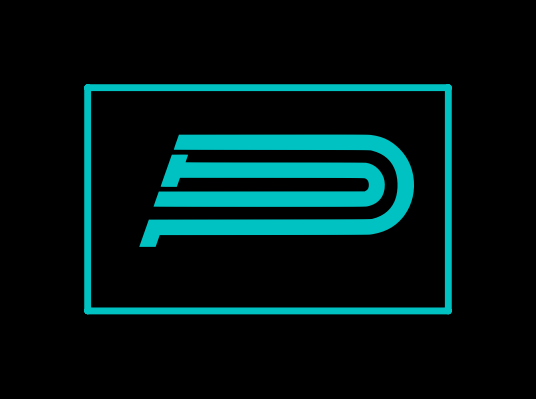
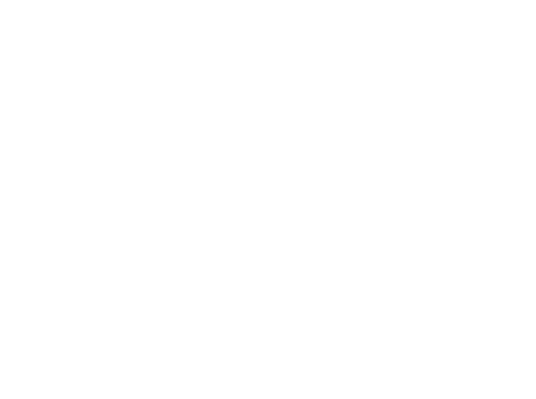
line: (448, 87) (87, 87) (87, 310) (448, 310) (448, 87) -> none
drawing: [139, 134, 415, 247] -> none

